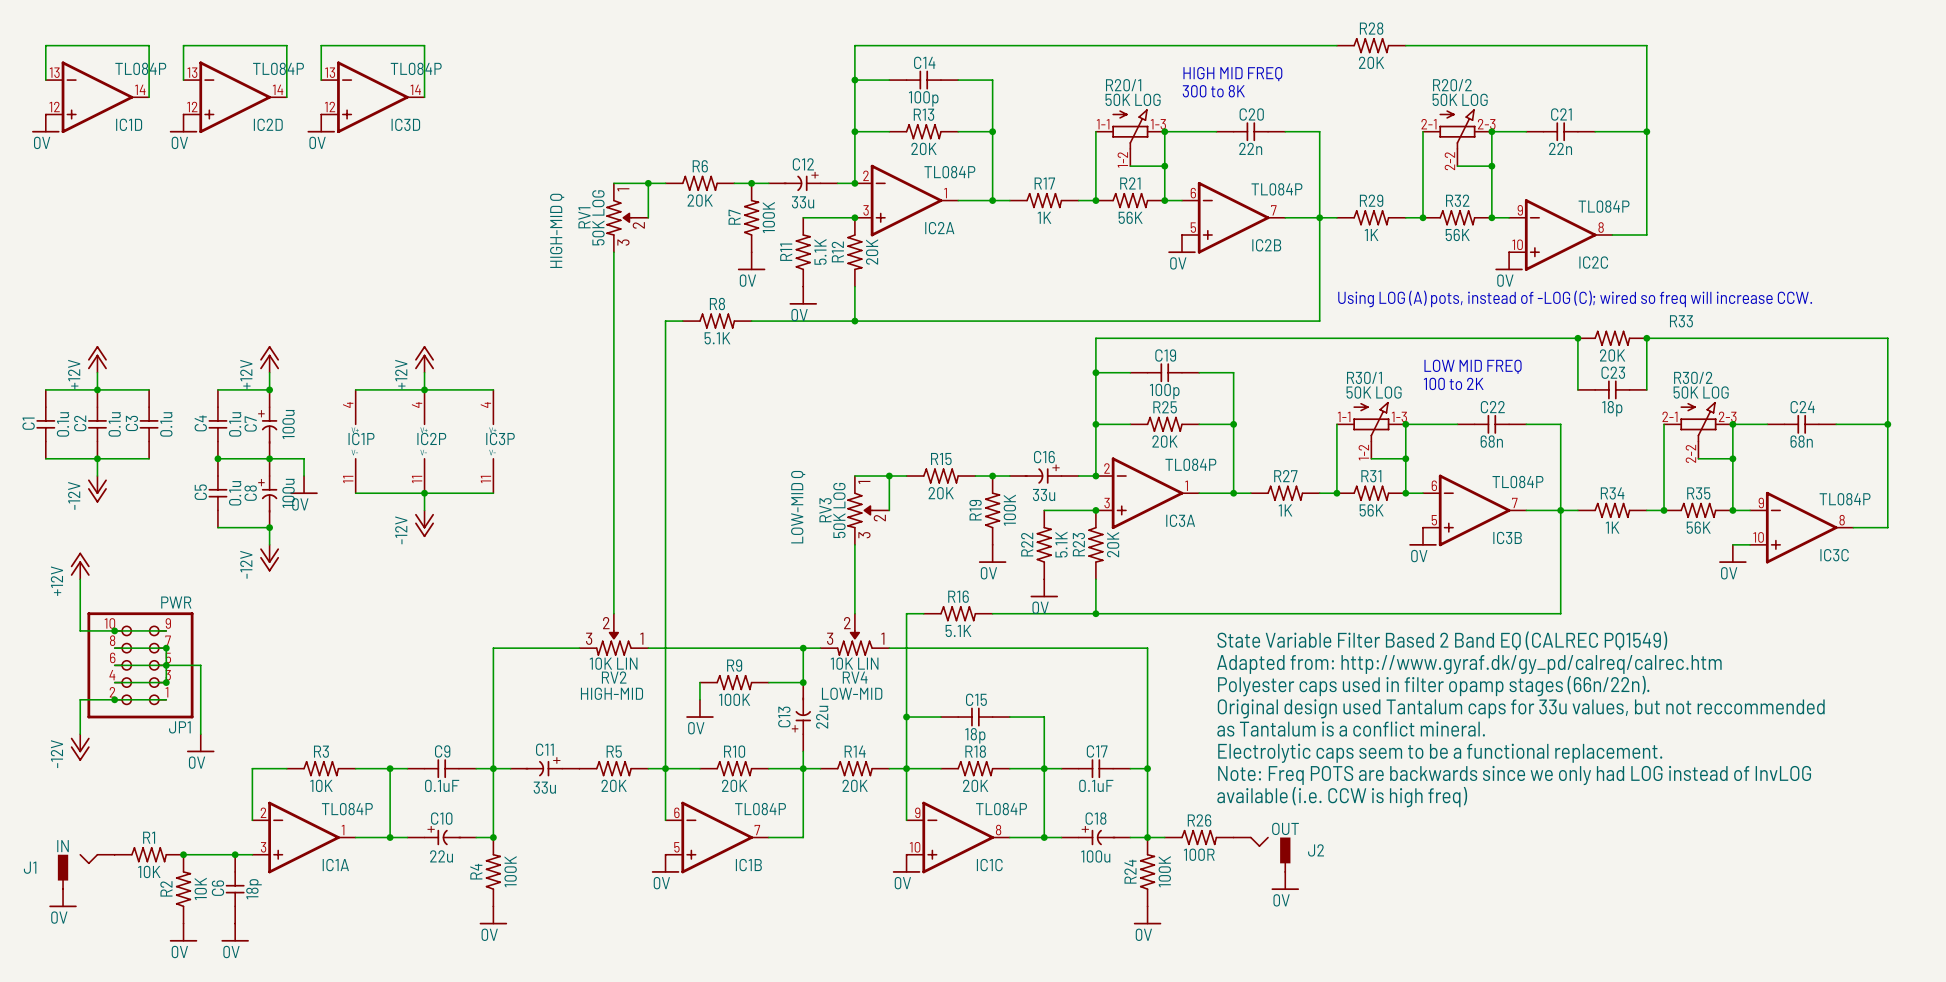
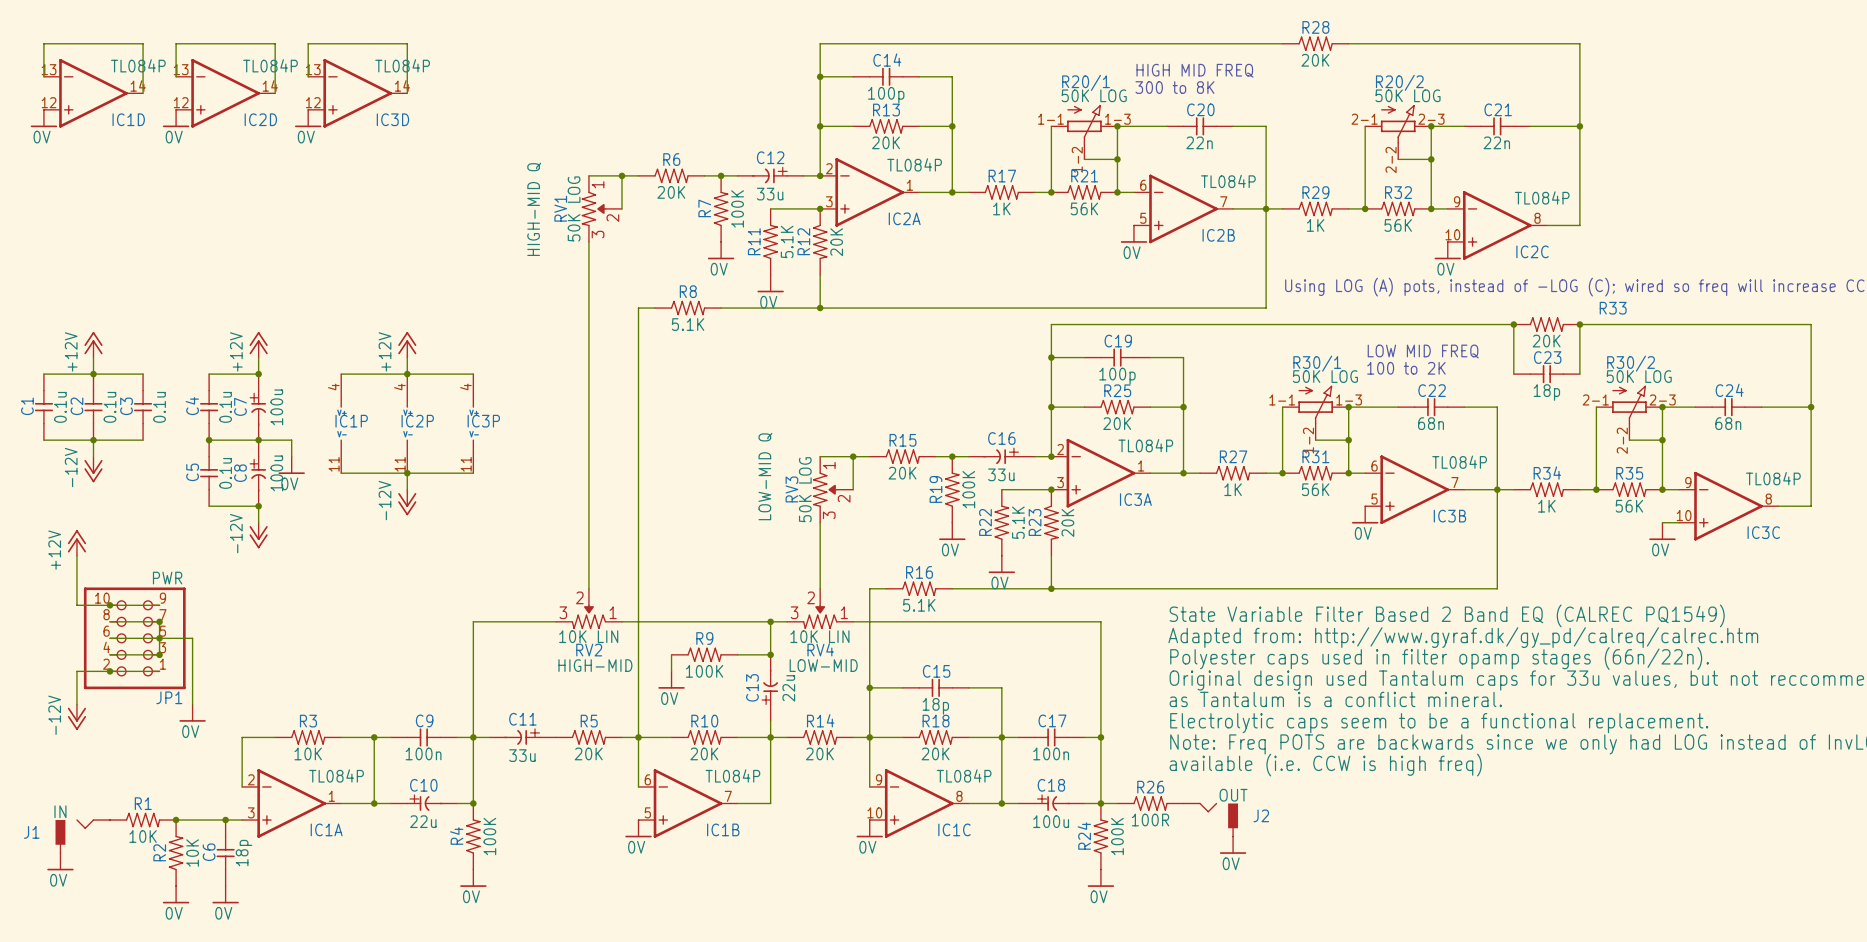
C9 value: 0.1uF (442, 785) -> 100n (423, 753)
C17 value: 0.1uF (1096, 785) -> 100n (1051, 753)

